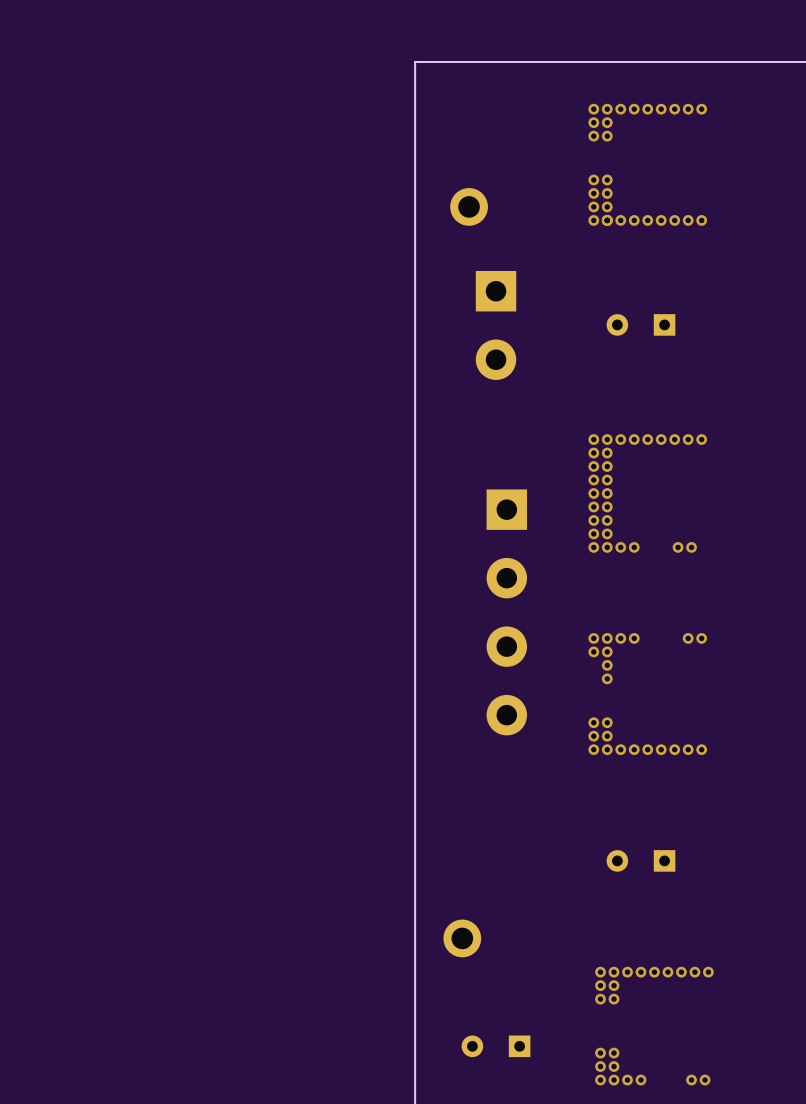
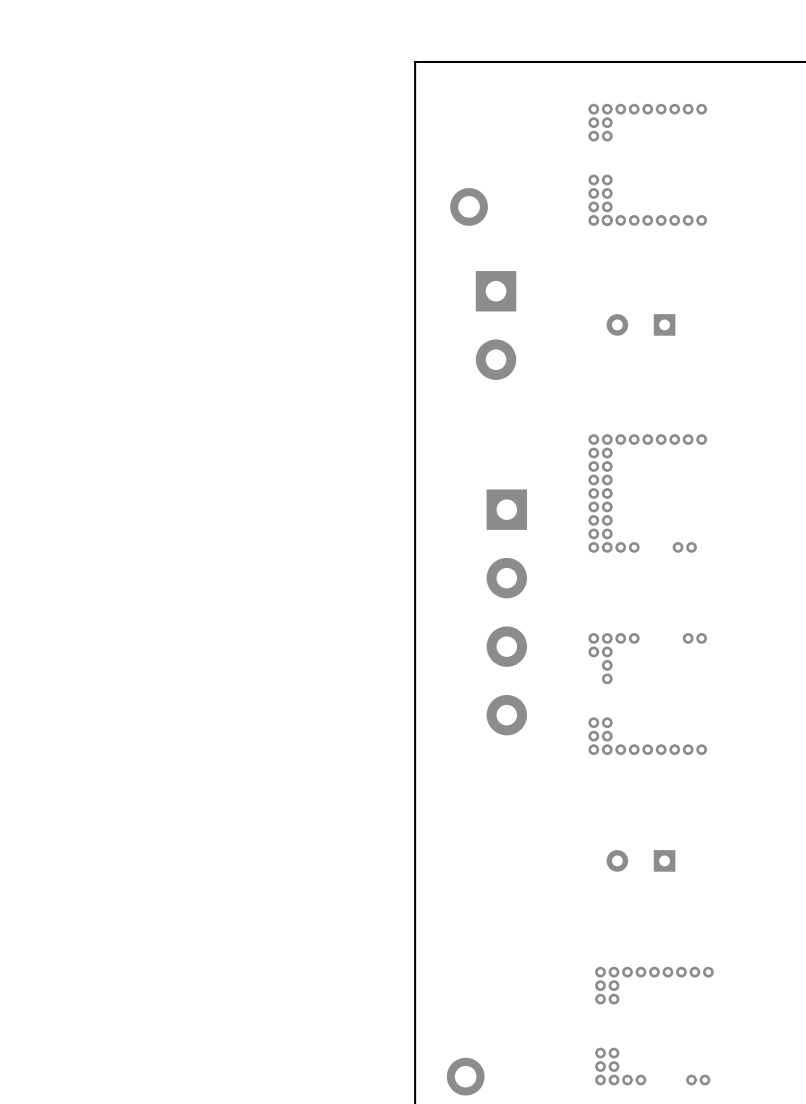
part position: (462, 938) -> (465, 1076)
part: (496, 1046) -> none

